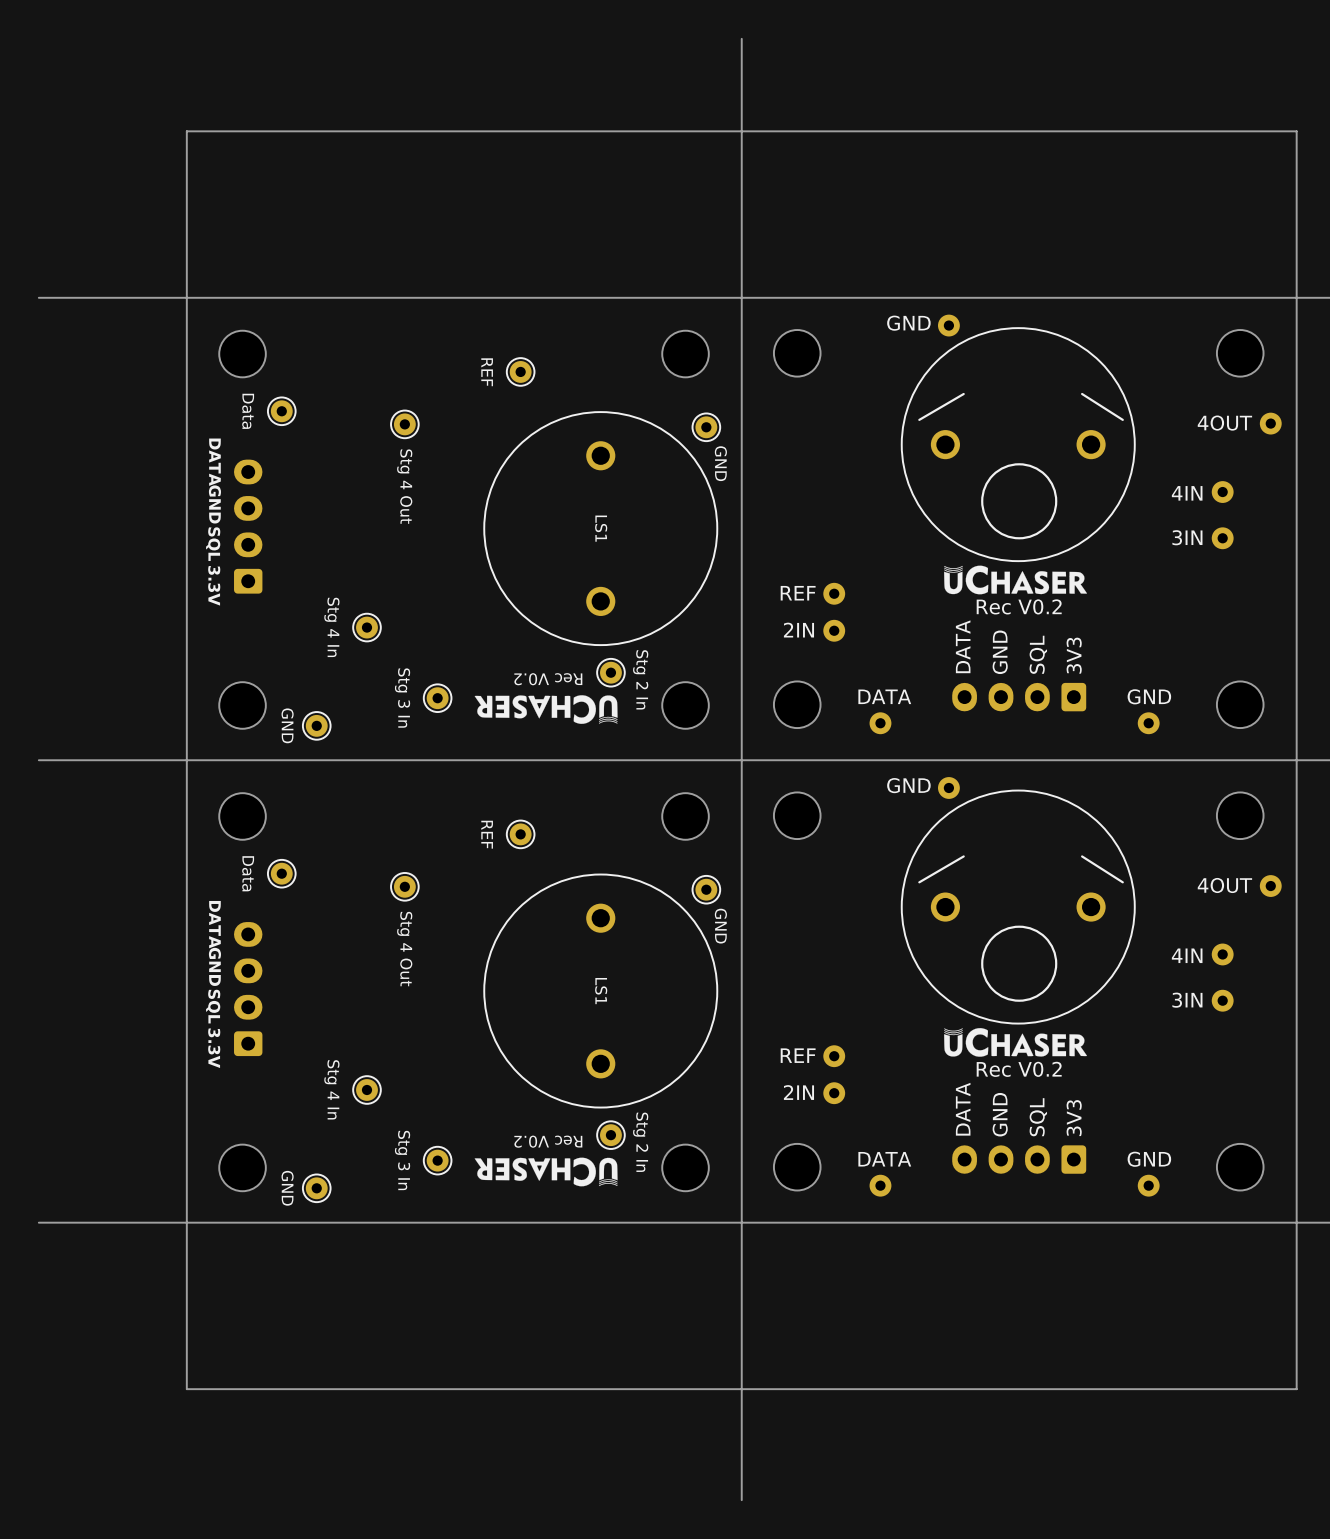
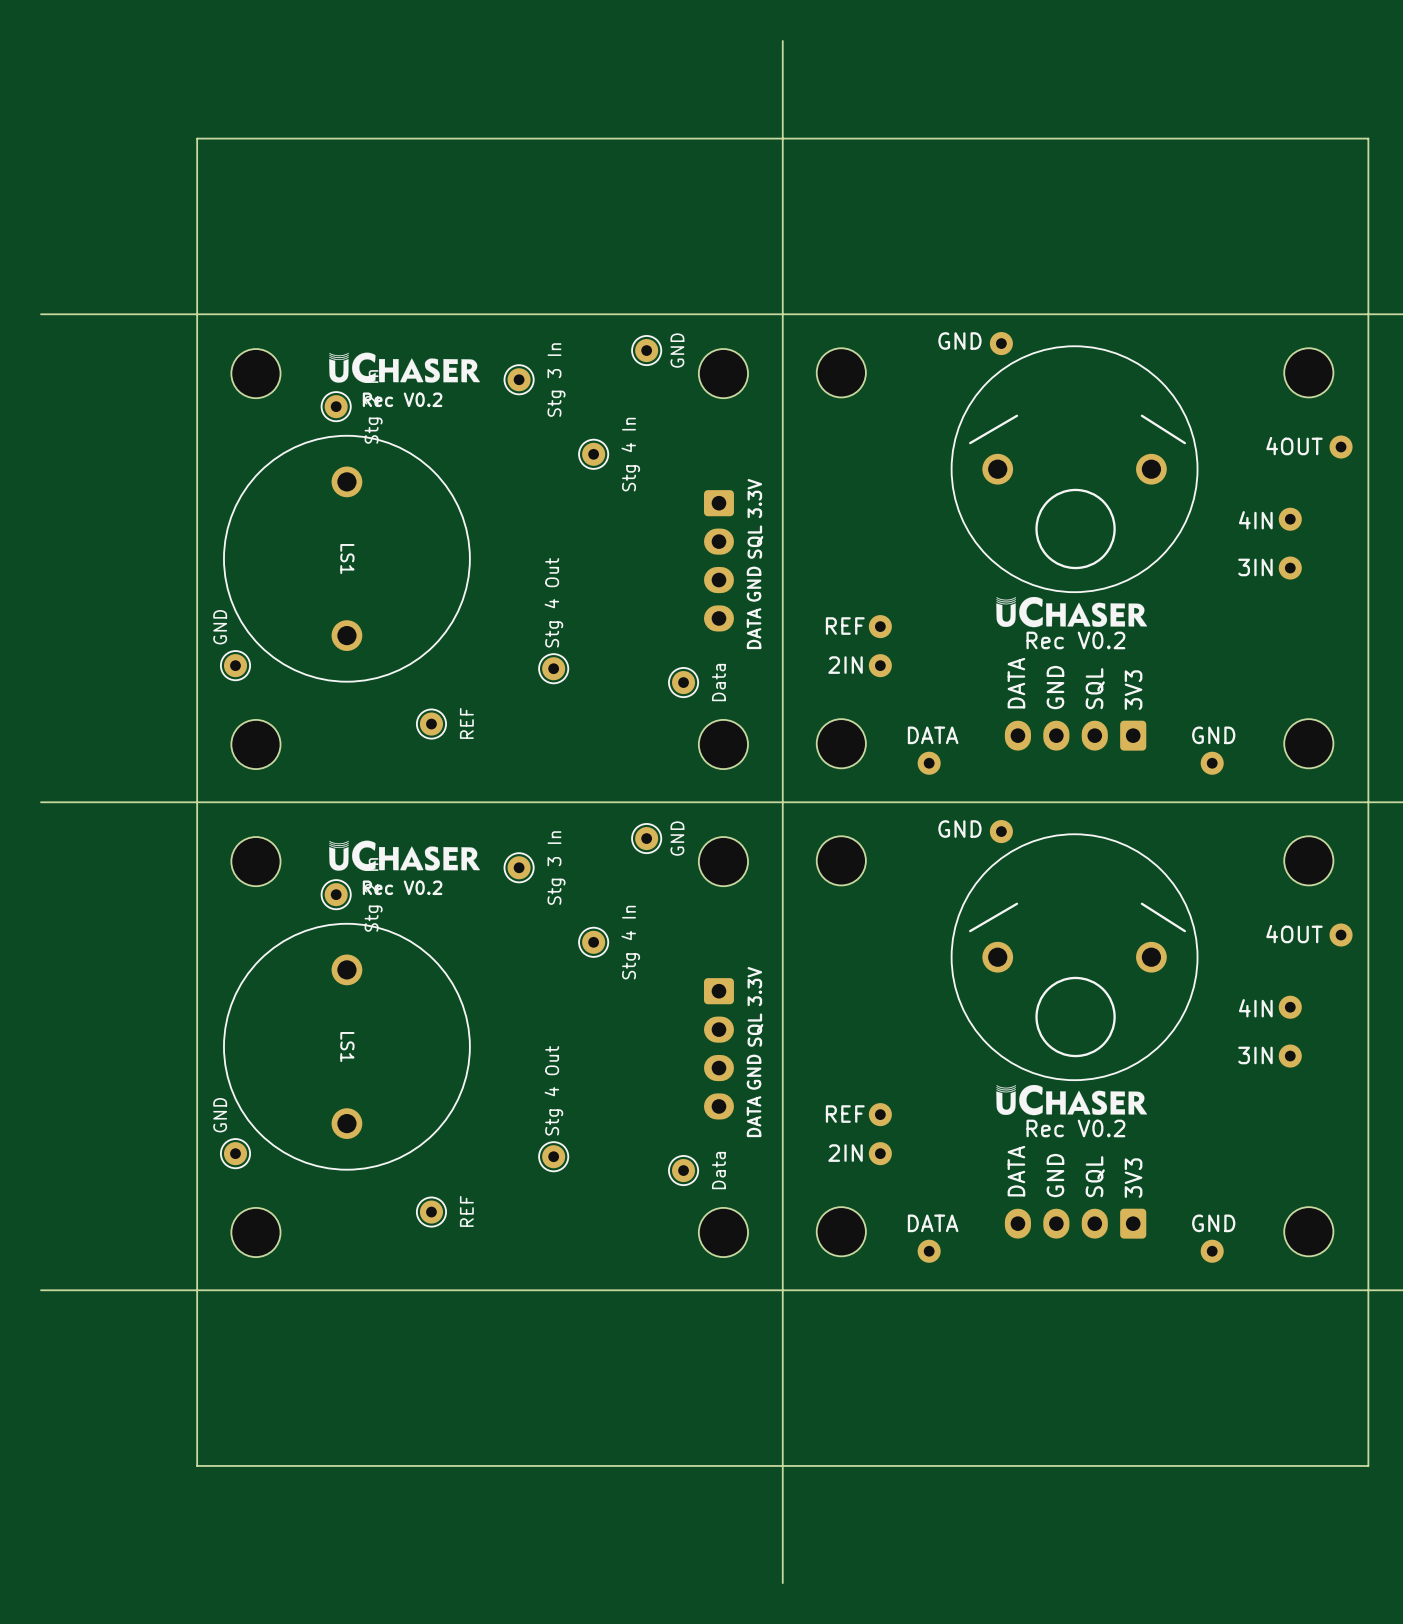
part: none -> (646, 350)
drawing: none -> [329, 352, 480, 383]
part: none -> (519, 379)
part: (520, 371) -> none
text: none -> Rec V0.2 (402, 399)
part: none -> (336, 406)
part: (281, 411) -> none
part: (404, 424) -> none
part: (706, 427) -> none
part: none -> (593, 454)
text: DATA (214, 462) -> none
text: none -> 3.3V (754, 498)
text: GND (214, 504) -> none
text: none -> SQL (755, 542)
part: (248, 526) -> none
LS1: (600, 528) -> none
LS1: none -> (346, 558)
part: none -> (718, 560)
text: SQL (213, 544) -> none
text: none -> GND (754, 584)
text: 3.3V (214, 585) -> none
text: none -> DATA (754, 628)
part: (366, 627) -> none
part: none -> (235, 665)
part: none -> (553, 668)
part: none -> (683, 682)
part: (610, 672) -> none
text: Rec V0.2 (548, 679) -> none
part: none -> (431, 724)
drawing: [474, 695, 618, 724] -> none
part rotation: 0° (437, 698) -> 180° (519, 867)
part position: (437, 698) -> (519, 867)
part: (316, 725) -> none
part: none -> (646, 838)
drawing: none -> [329, 840, 480, 871]
part: (520, 834) -> none
text: none -> Rec V0.2 (402, 887)
part: none -> (336, 894)
part: (281, 873) -> none
part: (404, 886) -> none
part: (706, 889) -> none
part: none -> (593, 942)
text: DATA (214, 924) -> none
text: none -> 3.3V (754, 986)
text: GND (214, 966) -> none
text: none -> SQL (755, 1030)
part: (248, 989) -> none
LS1: none -> (346, 1046)
LS1: (600, 991) -> none
part: none -> (718, 1048)
text: SQL (213, 1006) -> none
text: none -> GND (754, 1072)
text: 3.3V (214, 1048) -> none
text: none -> DATA (754, 1116)
part: (366, 1089) -> none
part: none -> (235, 1153)
part: none -> (553, 1156)
part: none -> (683, 1170)
part: (610, 1135) -> none
text: Rec V0.2 (548, 1141) -> none
part: none -> (431, 1212)
drawing: [474, 1157, 618, 1187] -> none
part: (437, 1160) -> none
part: (316, 1188) -> none

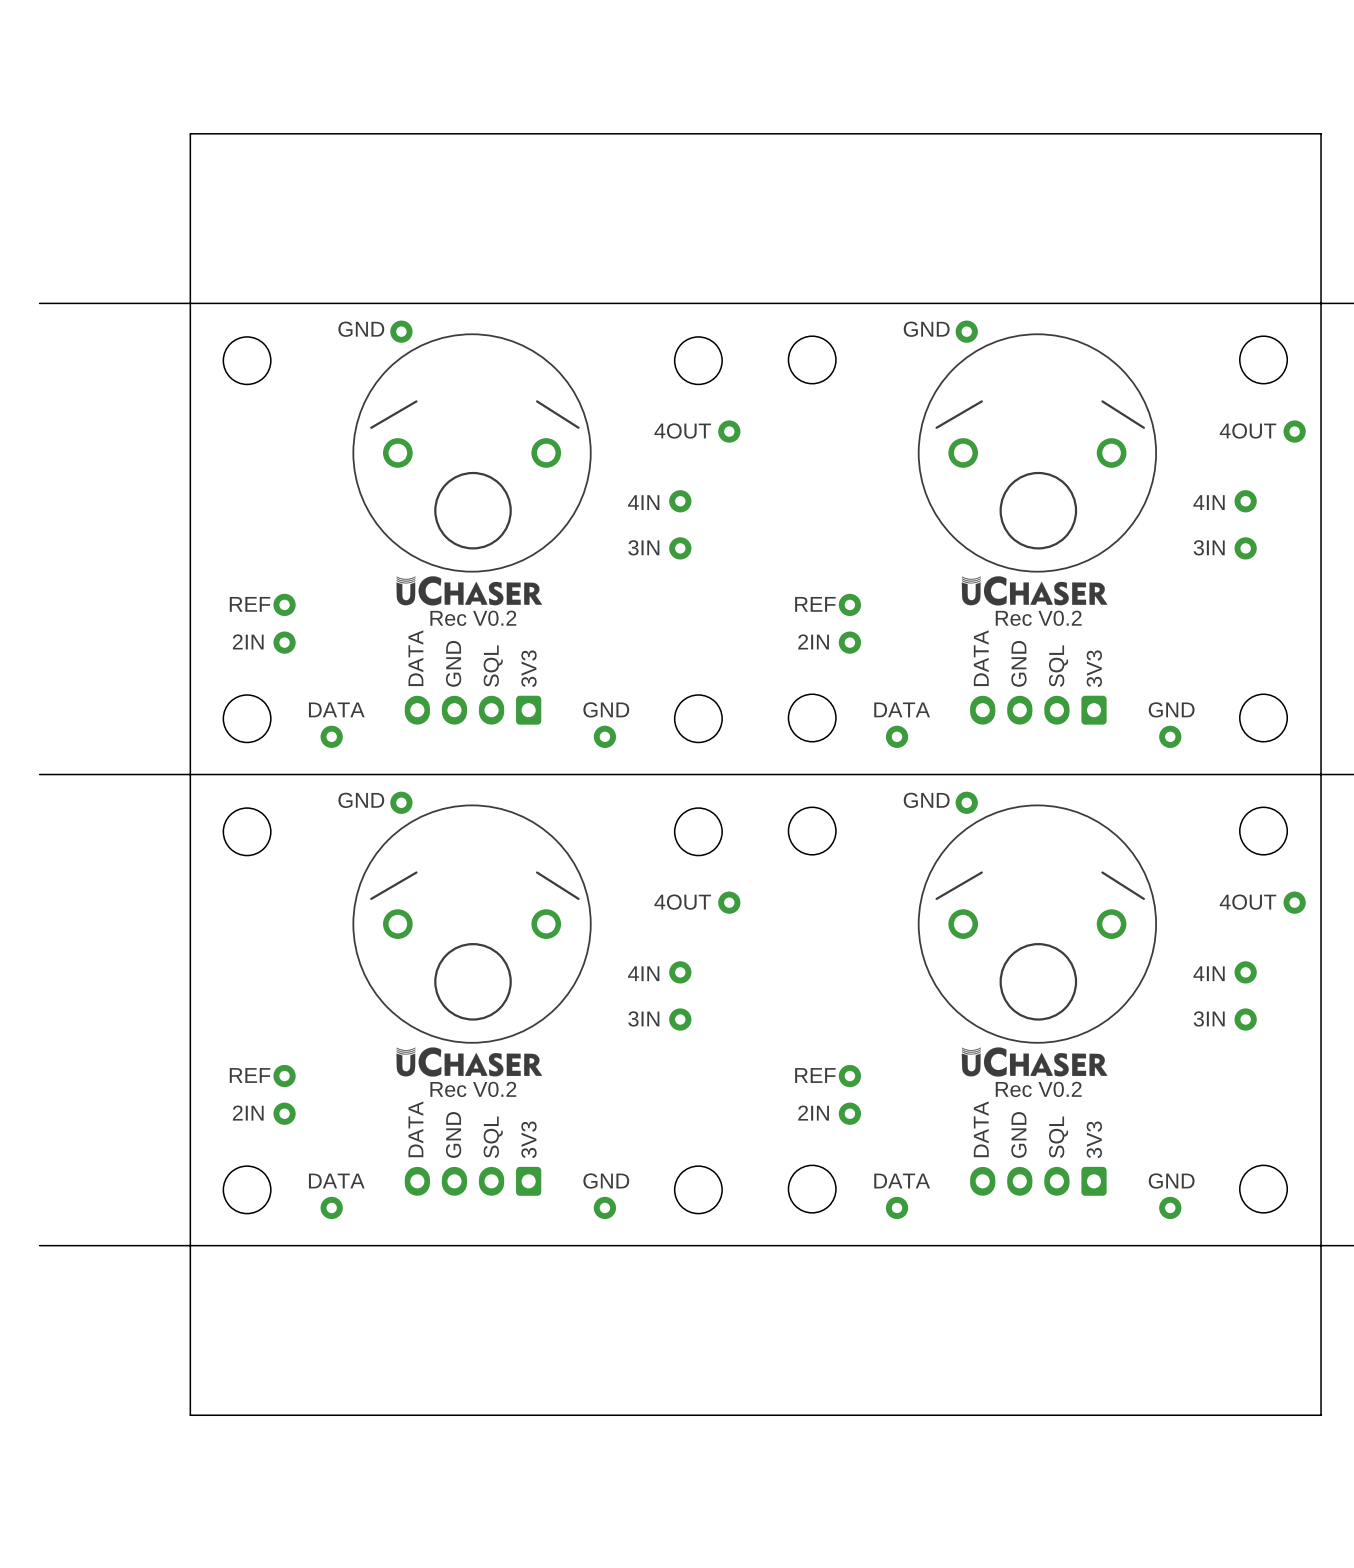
board edge: (782, 40) (782, 1583) -> none
text: none -> GND (361, 329)
part: none -> (401, 331)
part: (646, 350) -> none
drawing: [329, 352, 480, 383] -> none
part: (519, 379) -> none
text: Rec V0.2 (402, 399) -> none
part: (336, 406) -> none
line: none -> (416, 401) (371, 427)
line: none -> (537, 401) (578, 427)
text: none -> 4OUT (682, 430)
part: none -> (729, 431)
part: (593, 454) -> none
part: none -> (472, 452)
drawing: none -> [434, 471, 512, 550]
text: 3.3V (754, 498) -> none
part: none -> (680, 501)
text: none -> 4IN (643, 502)
text: SQL (755, 542) -> none
LS1: (346, 558) -> none
part: (718, 560) -> none
text: none -> 3IN (643, 547)
part: none -> (680, 548)
text: GND (754, 584) -> none
drawing: none -> [396, 576, 543, 606]
text: none -> REF (250, 604)
part: none -> (284, 604)
text: DATA (754, 628) -> none
text: none -> Rec V0.2 (473, 618)
part: (235, 665) -> none
text: none -> 2IN (248, 641)
part: none -> (284, 642)
part: (553, 668) -> none
part: (683, 682) -> none
text: none -> DATA (415, 658)
text: none -> GND (453, 663)
text: none -> SQL (493, 666)
text: none -> 3V3 (528, 668)
part: (431, 724) -> none
text: none -> DATA (336, 709)
part: none -> (473, 710)
text: none -> GND (606, 709)
part: none -> (331, 736)
part: none -> (604, 736)
text: none -> GND (361, 800)
part: none -> (401, 802)
part: (646, 838) -> none
drawing: [329, 840, 480, 871] -> none
part: (519, 867) -> none
text: Rec V0.2 (402, 887) -> none
part: (336, 894) -> none
line: none -> (416, 872) (371, 898)
line: none -> (537, 872) (578, 898)
text: none -> 4OUT (682, 902)
part: none -> (729, 902)
part: (593, 942) -> none
part: none -> (472, 924)
drawing: none -> [434, 943, 512, 1021]
text: 3.3V (754, 986) -> none
part: none -> (680, 972)
text: none -> 4IN (643, 973)
text: SQL (755, 1030) -> none
LS1: (346, 1046) -> none
part: (718, 1048) -> none
text: none -> 3IN (643, 1018)
part: none -> (680, 1019)
text: GND (754, 1072) -> none
drawing: none -> [396, 1047, 543, 1077]
text: none -> REF (250, 1075)
part: none -> (284, 1076)
text: DATA (754, 1116) -> none
text: none -> Rec V0.2 (473, 1089)
part: (235, 1153) -> none
text: none -> 2IN (248, 1113)
part: none -> (284, 1113)
part: (553, 1156) -> none
part: (683, 1170) -> none
text: none -> DATA (415, 1129)
text: none -> GND (453, 1134)
text: none -> SQL (493, 1137)
text: none -> 3V3 (528, 1139)
part: (431, 1212) -> none
text: none -> DATA (336, 1181)
part: none -> (473, 1181)
text: none -> GND (606, 1181)
part: none -> (331, 1207)
part: none -> (604, 1207)

